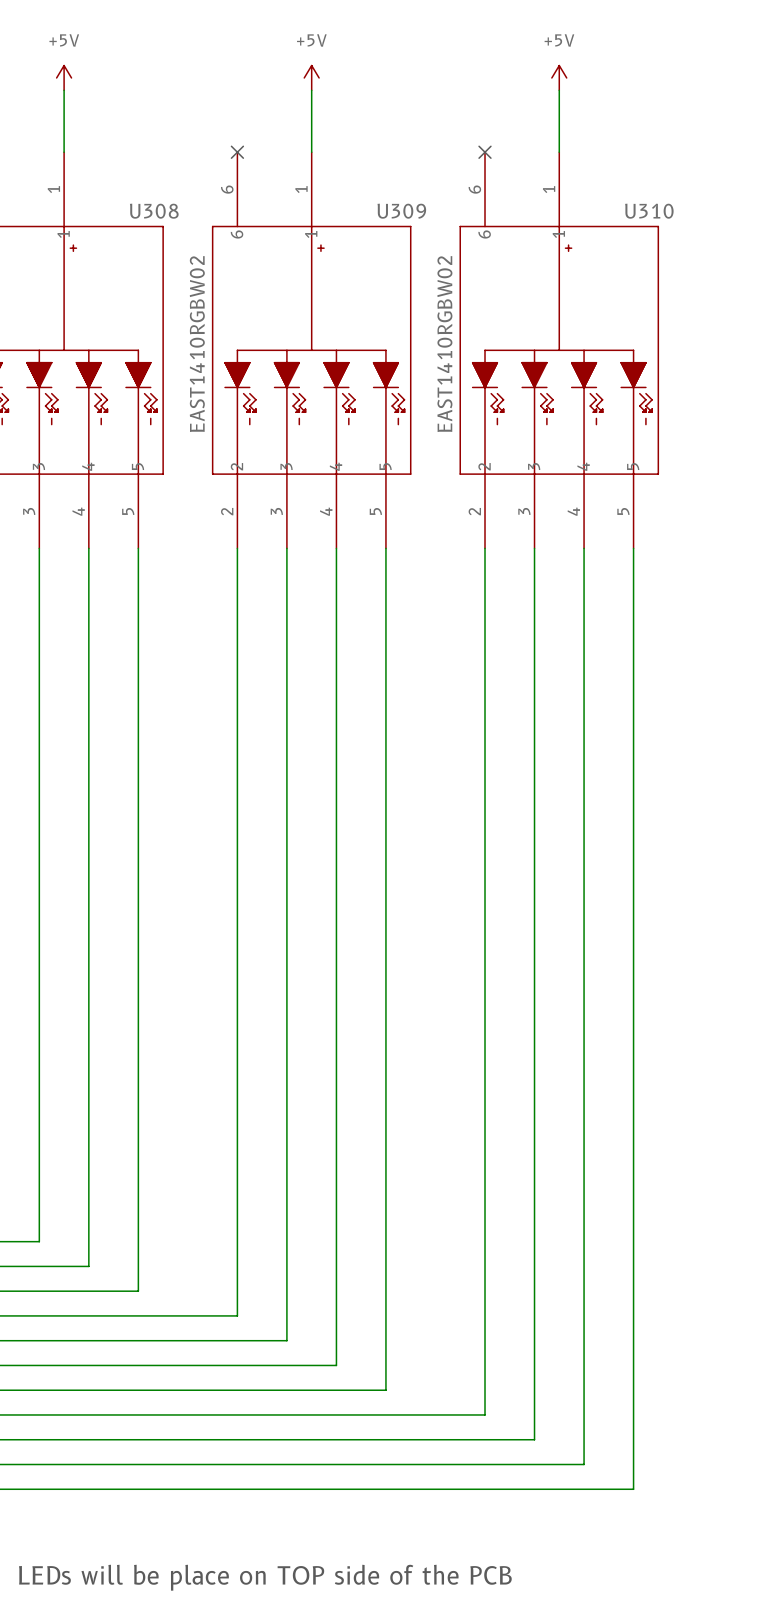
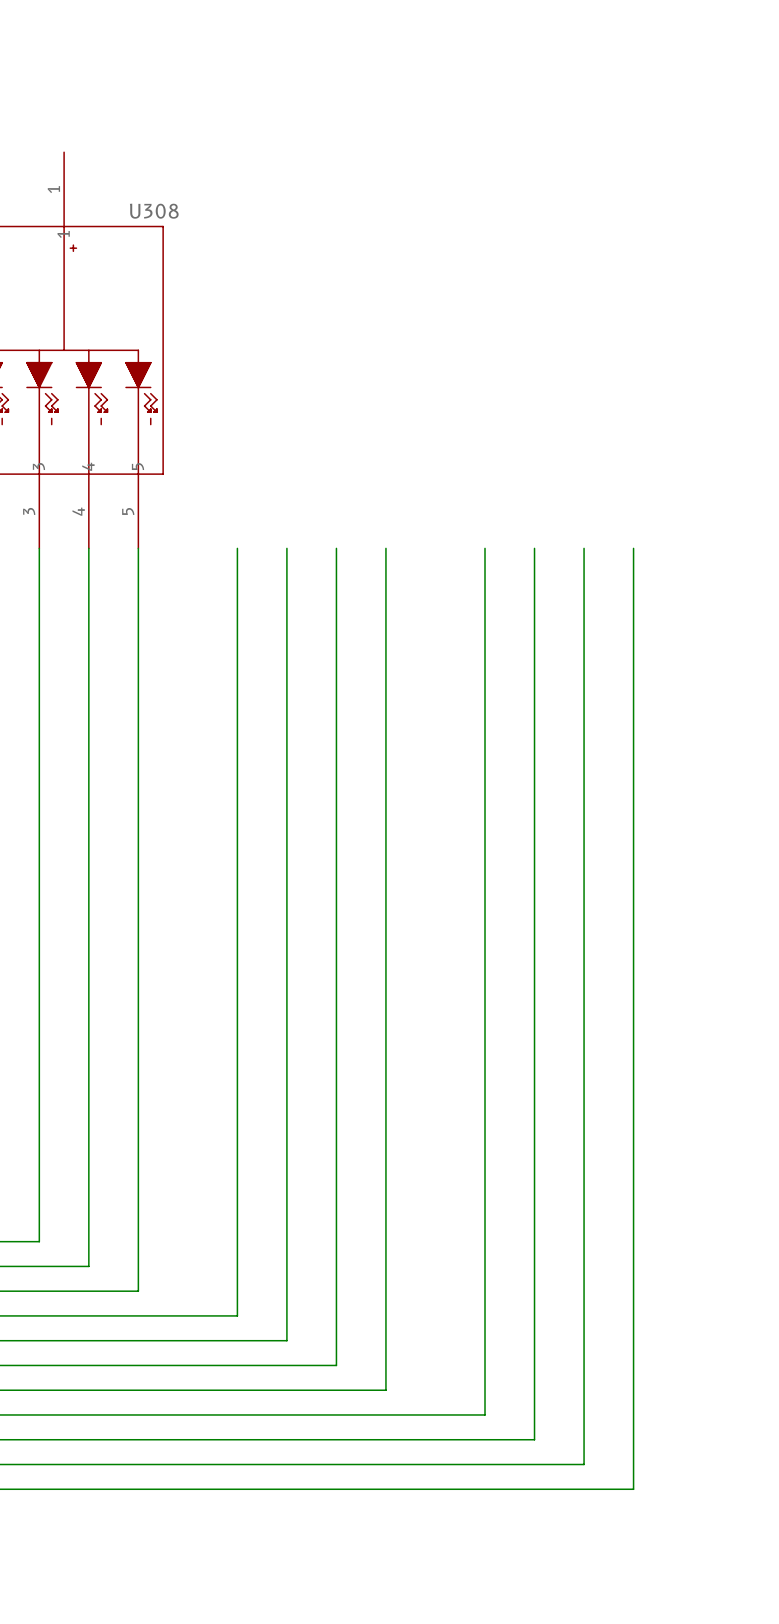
power symbol: +5V (64, 77) -> none
power symbol: +5V (311, 77) -> none
power symbol: +5V (559, 77) -> none
wire: (64, 90) (64, 152) -> none
wire: (311, 90) (311, 152) -> none
wire: (559, 90) (559, 152) -> none
no-connect mark: (237, 152) -> none
no-connect mark: (485, 152) -> none
U309: EAST1410RGBW02 (311, 350) -> none
U310: EAST1410RGBW02 (559, 350) -> none
text: LEDs will be place on TOP side of the PCB (265, 1577) -> none

